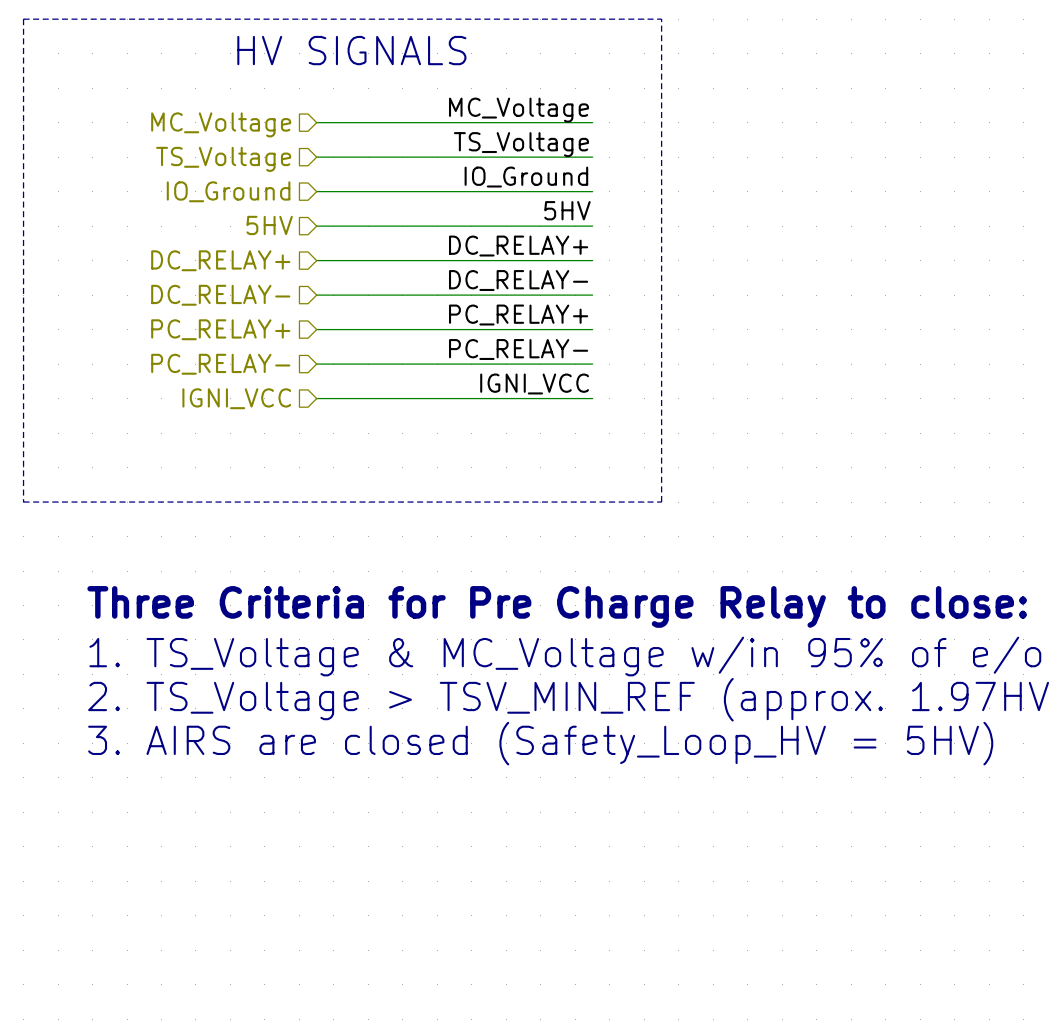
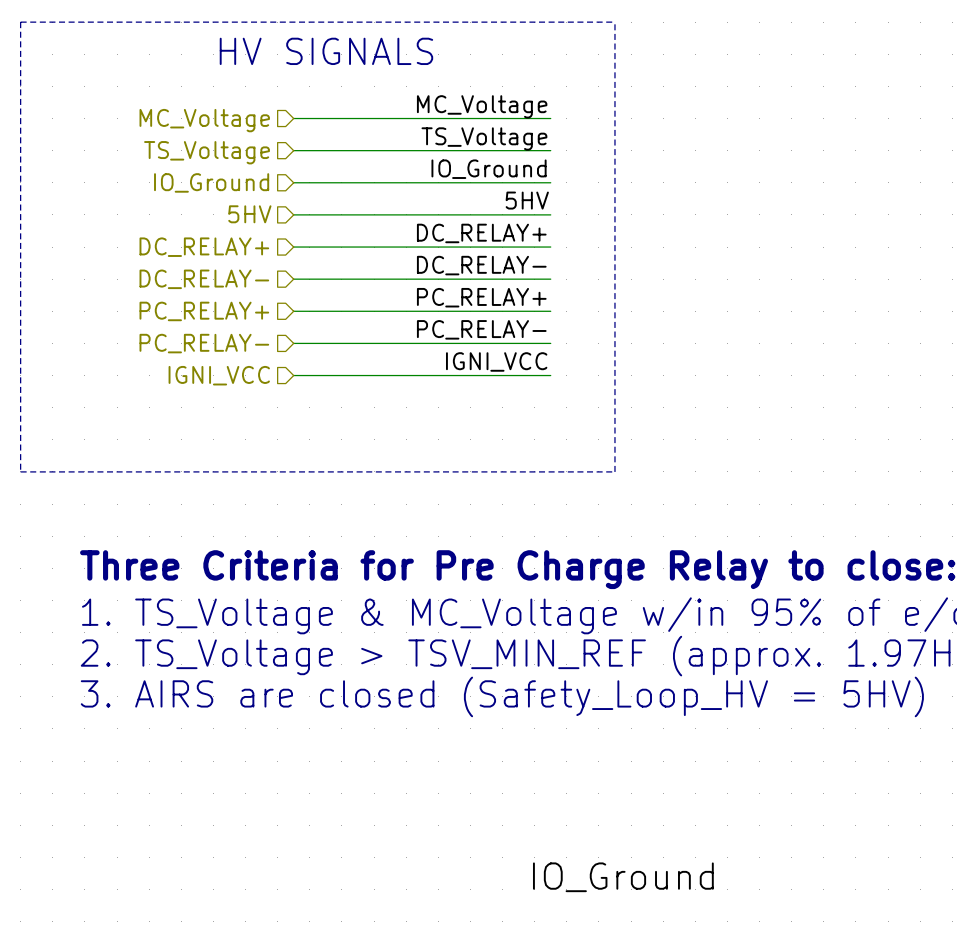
label: none -> IO_Ground (623, 877)

